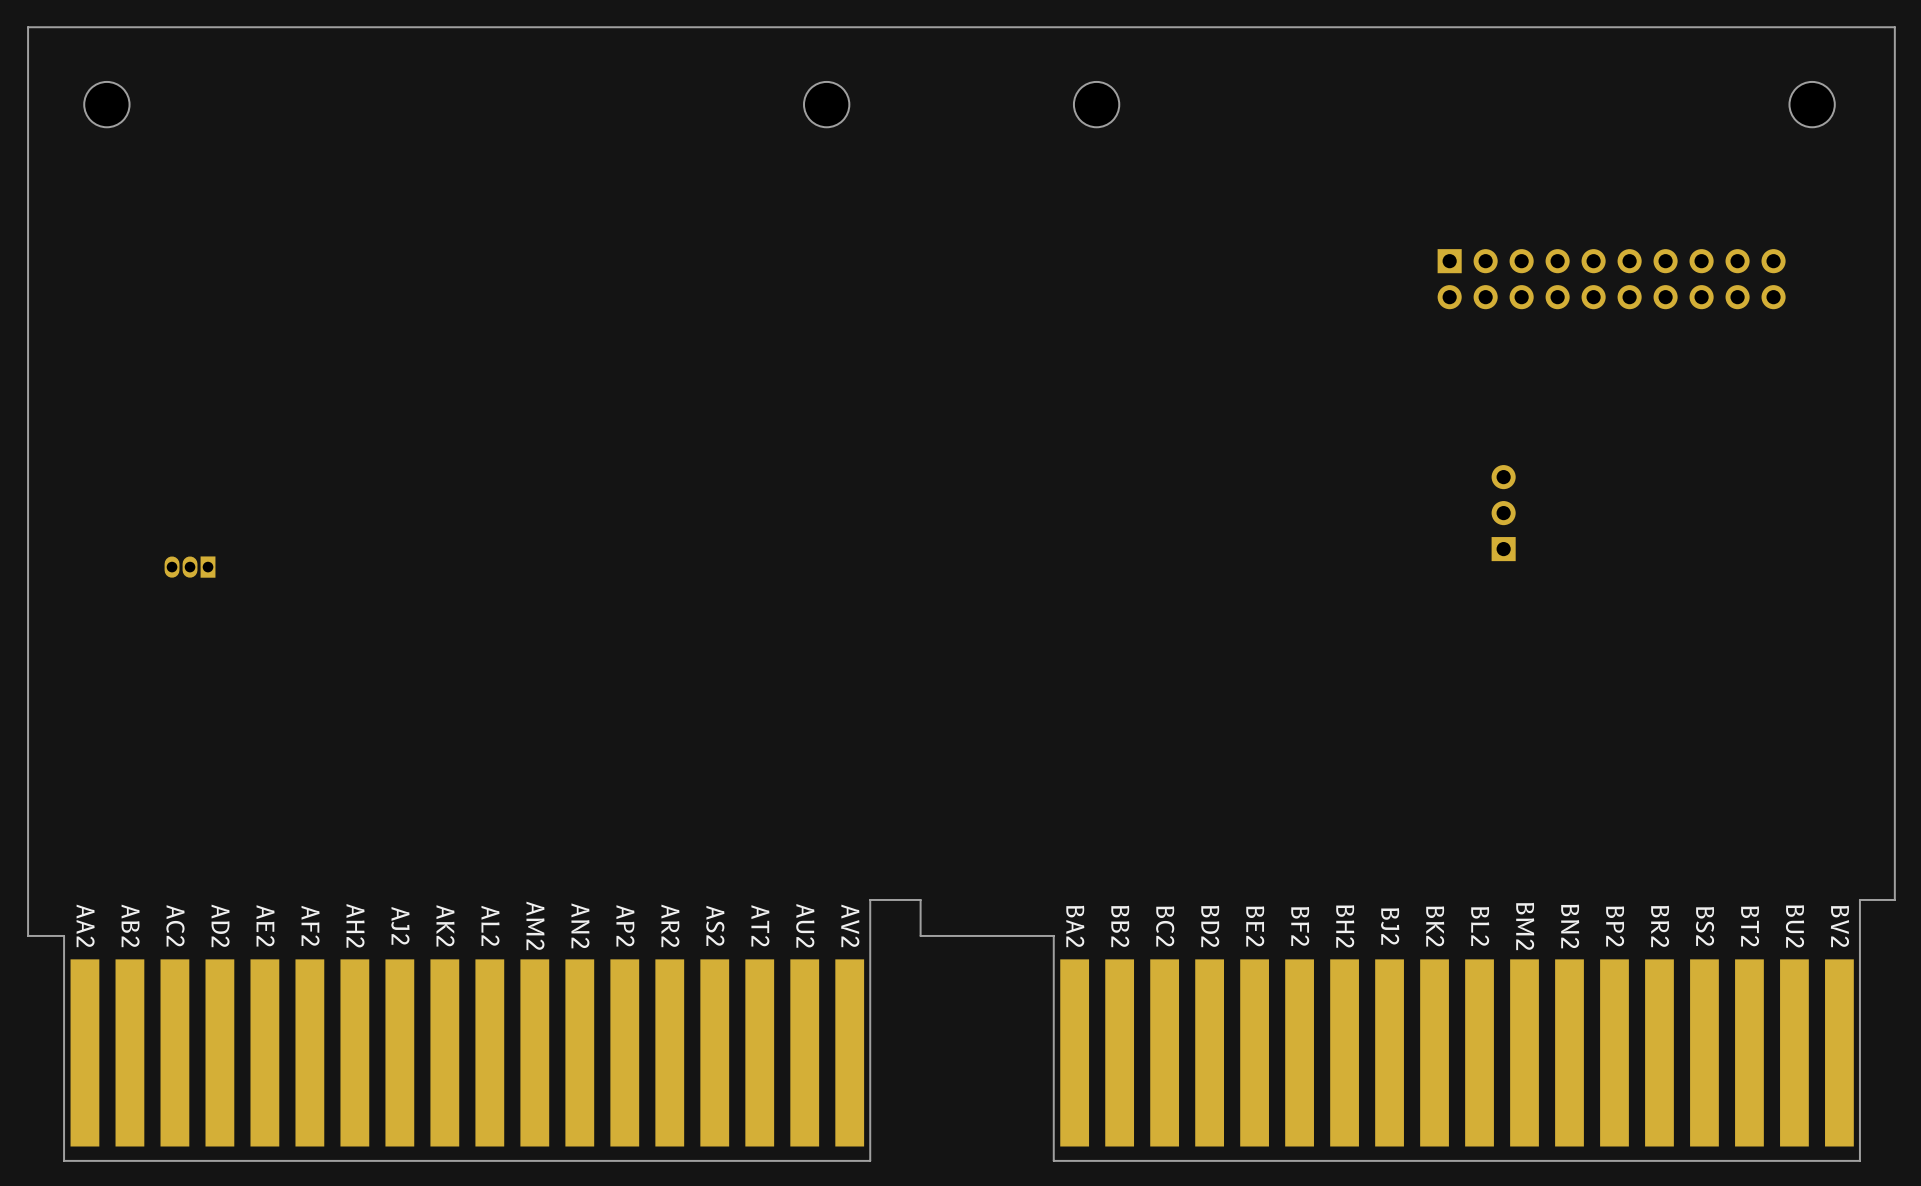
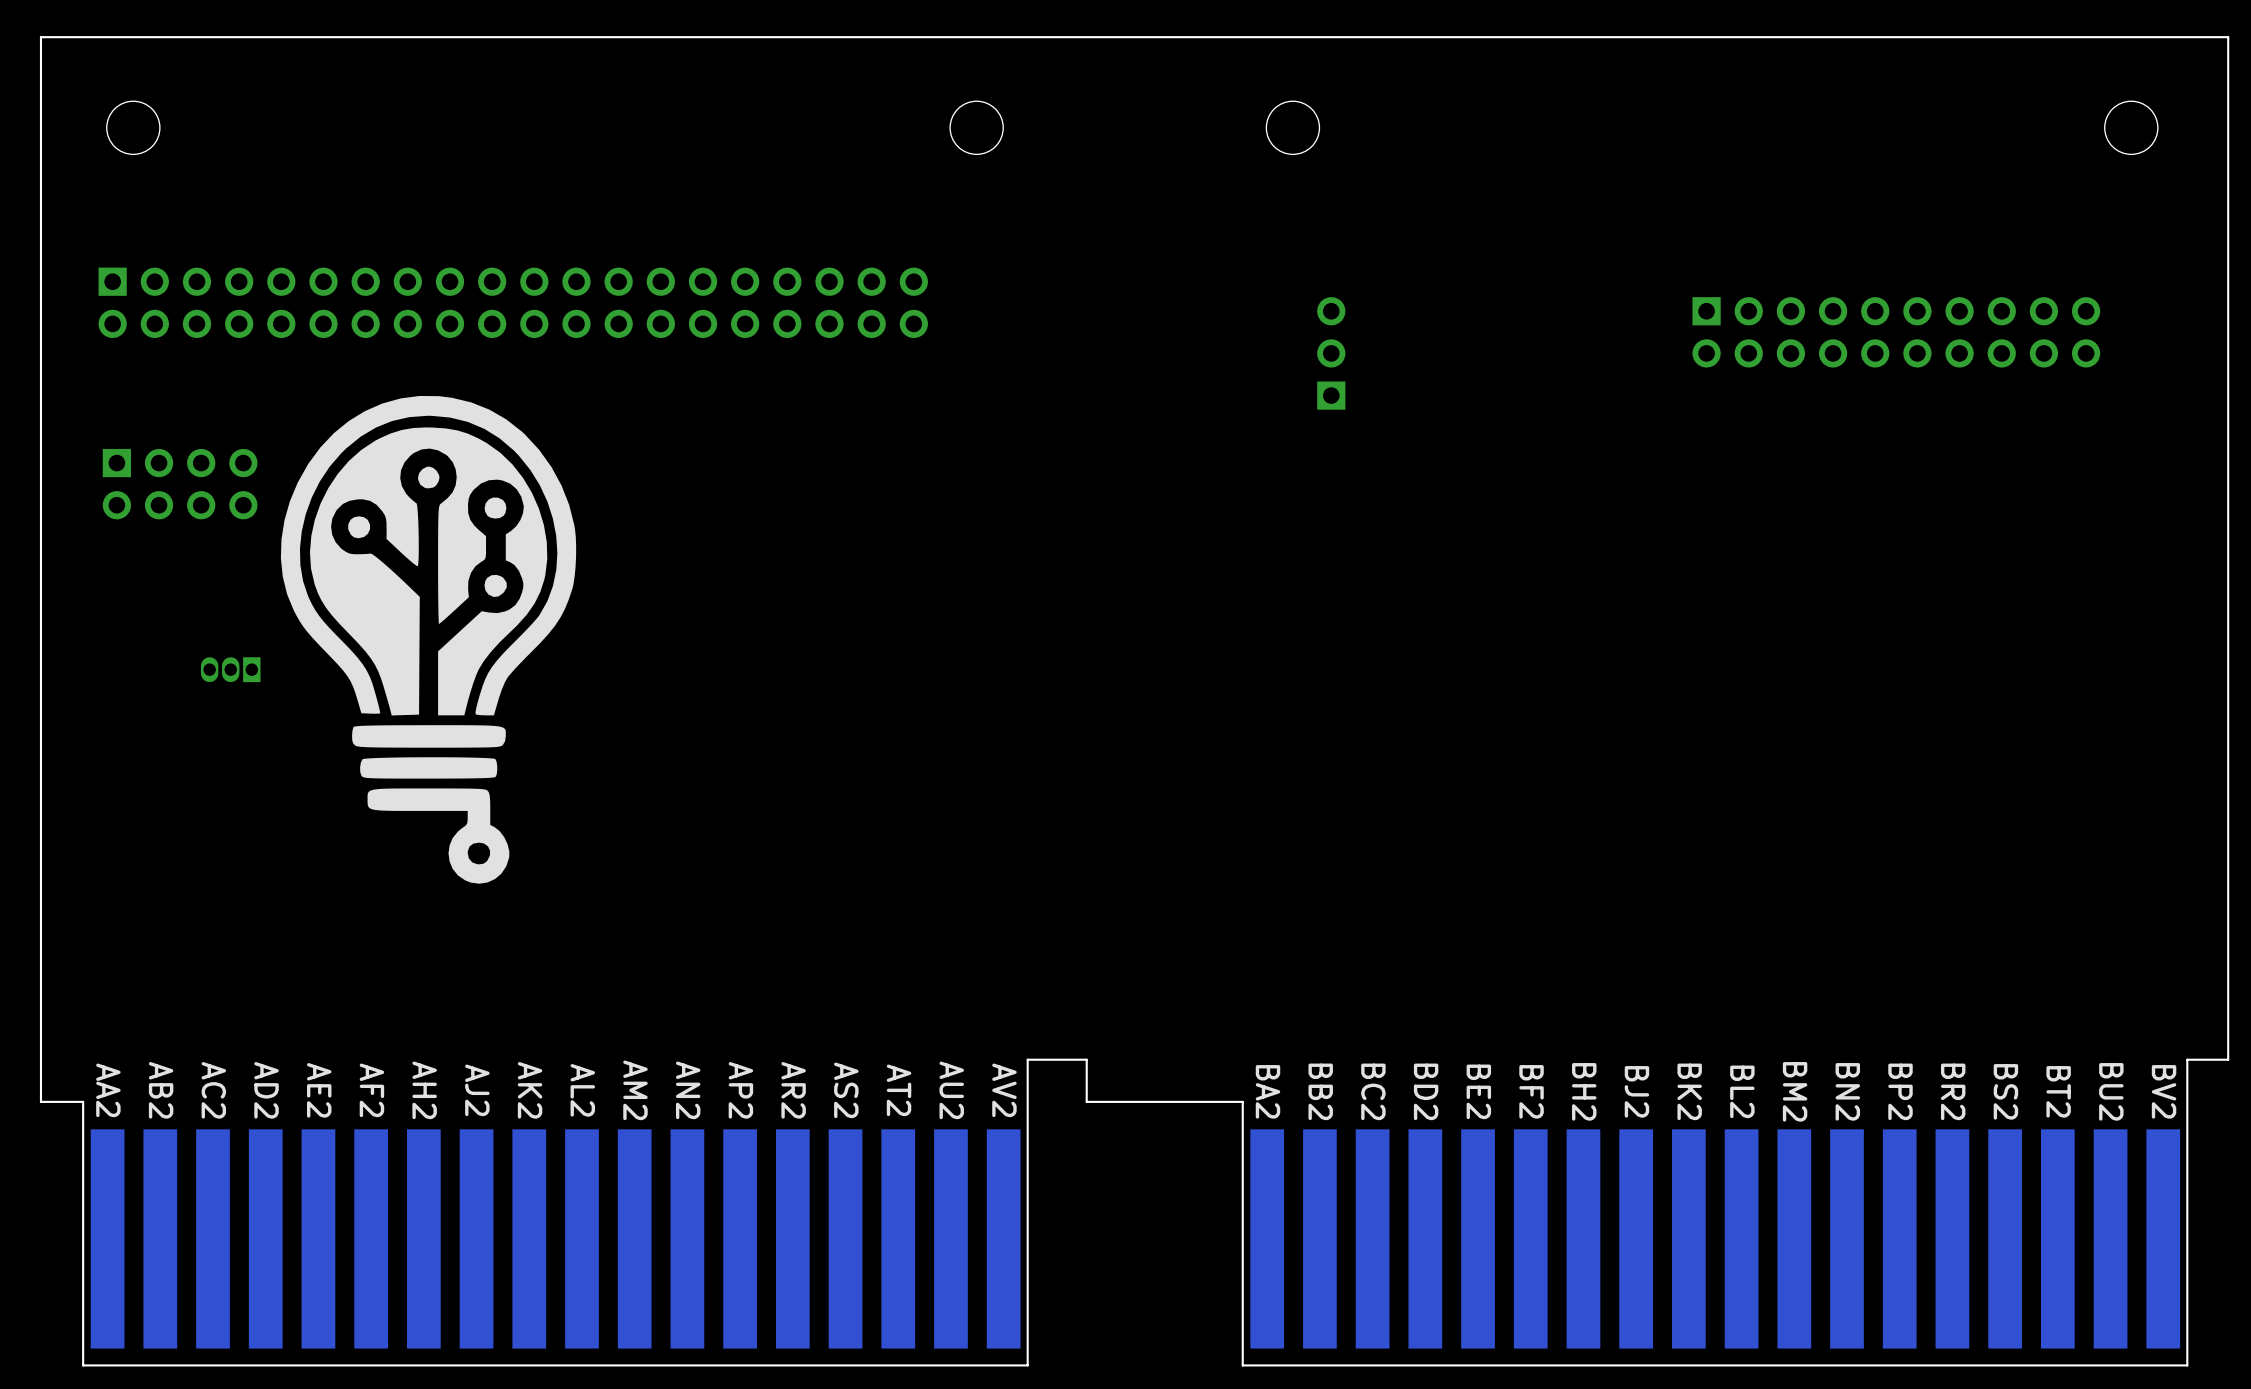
part: none -> (513, 302)
part: none -> (1331, 353)
drawing: none -> [280, 395, 577, 884]
part: none -> (180, 484)
part: (1503, 513) -> none

